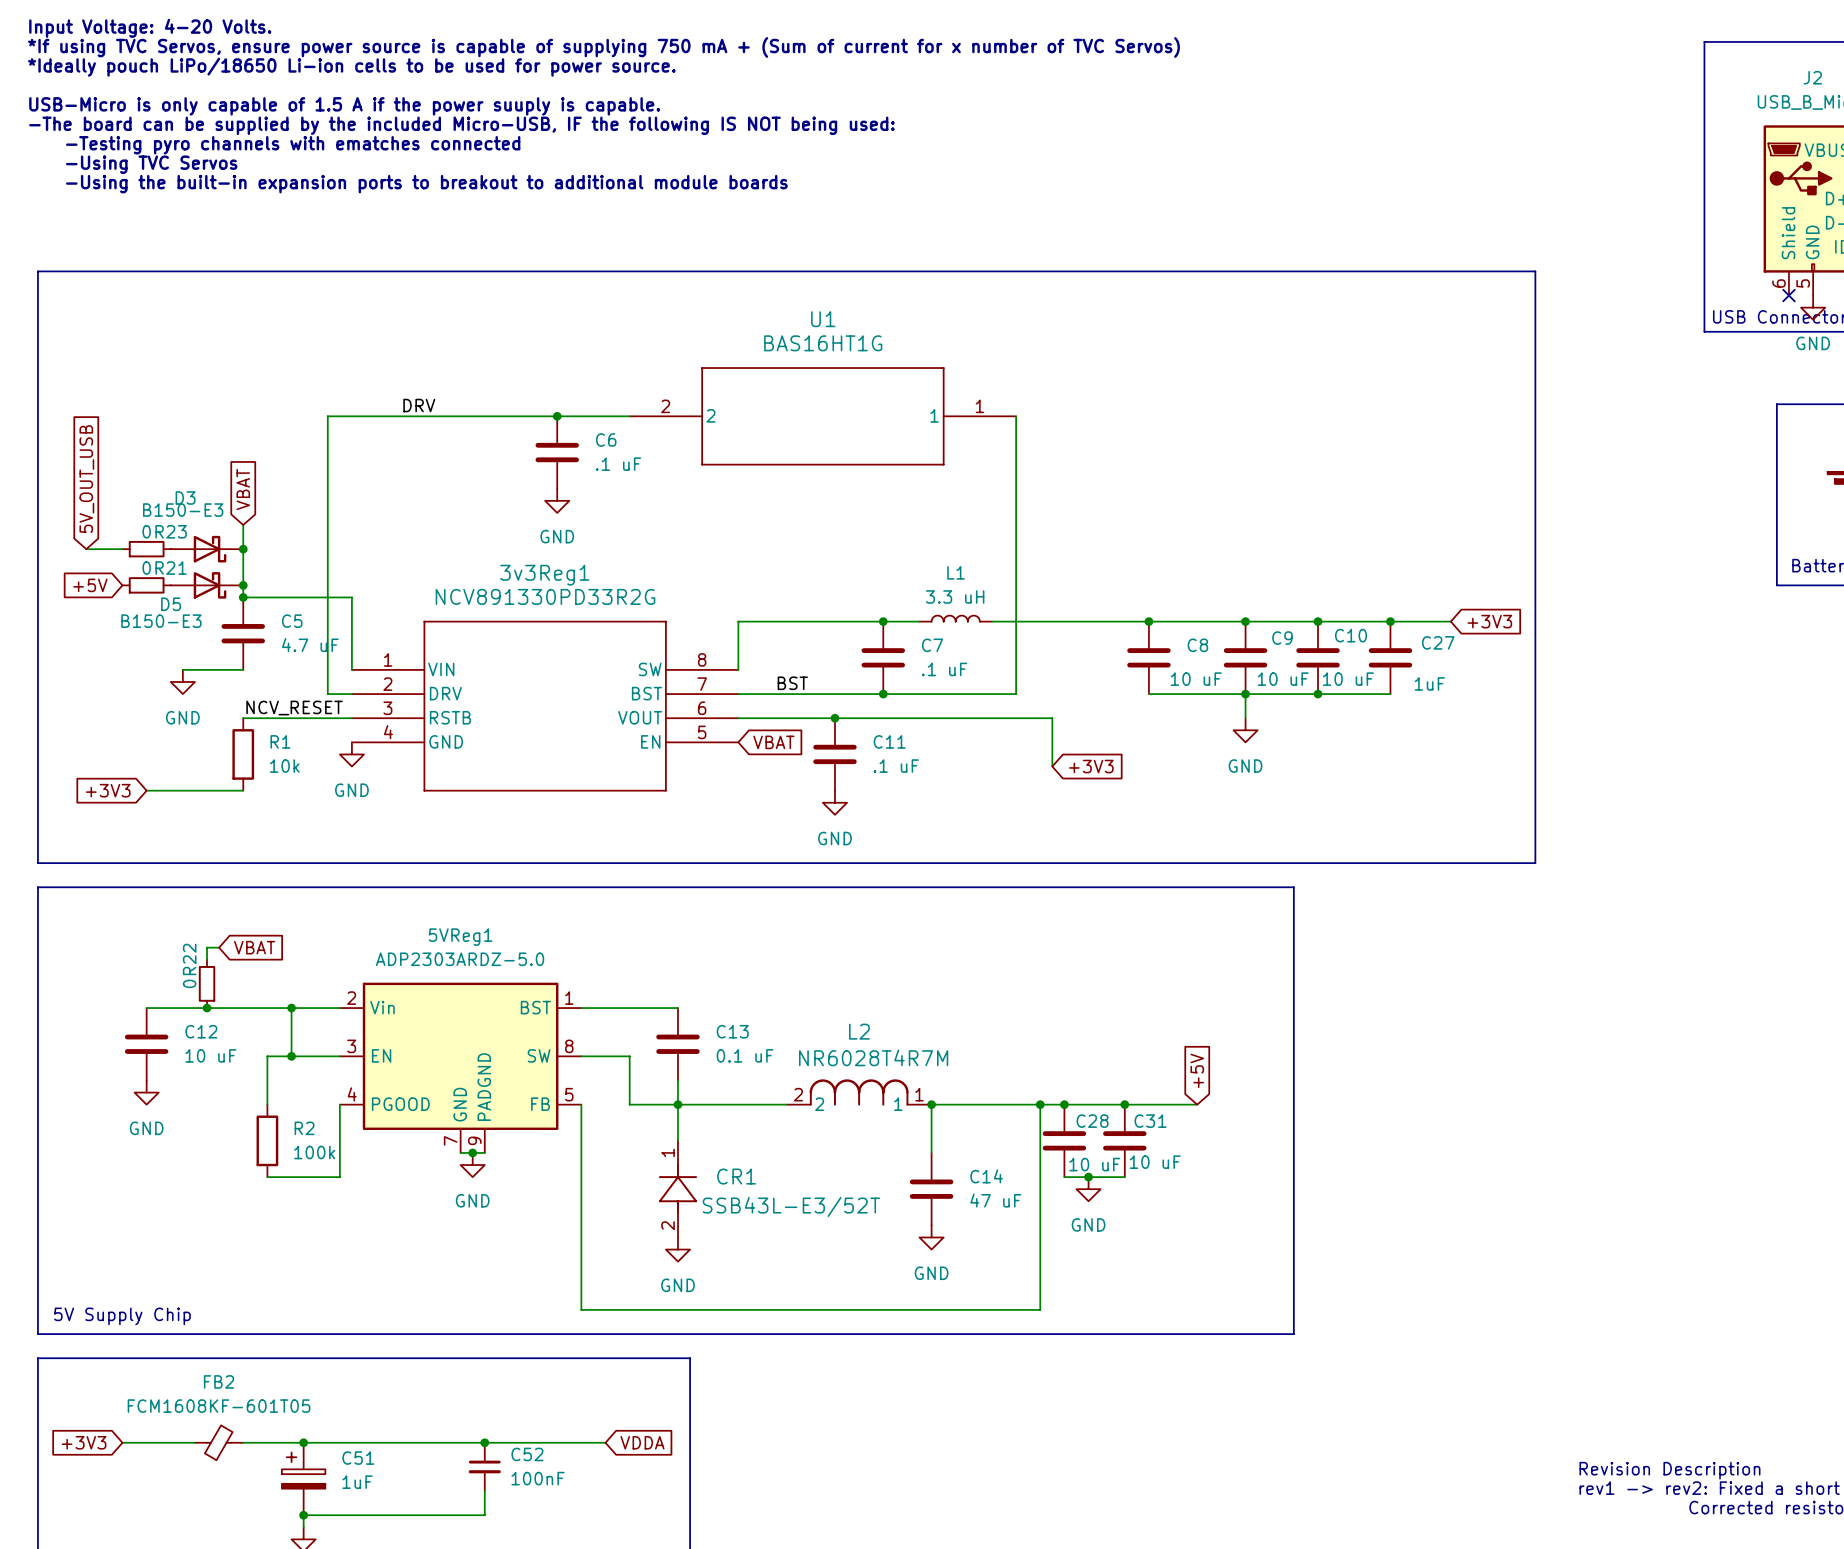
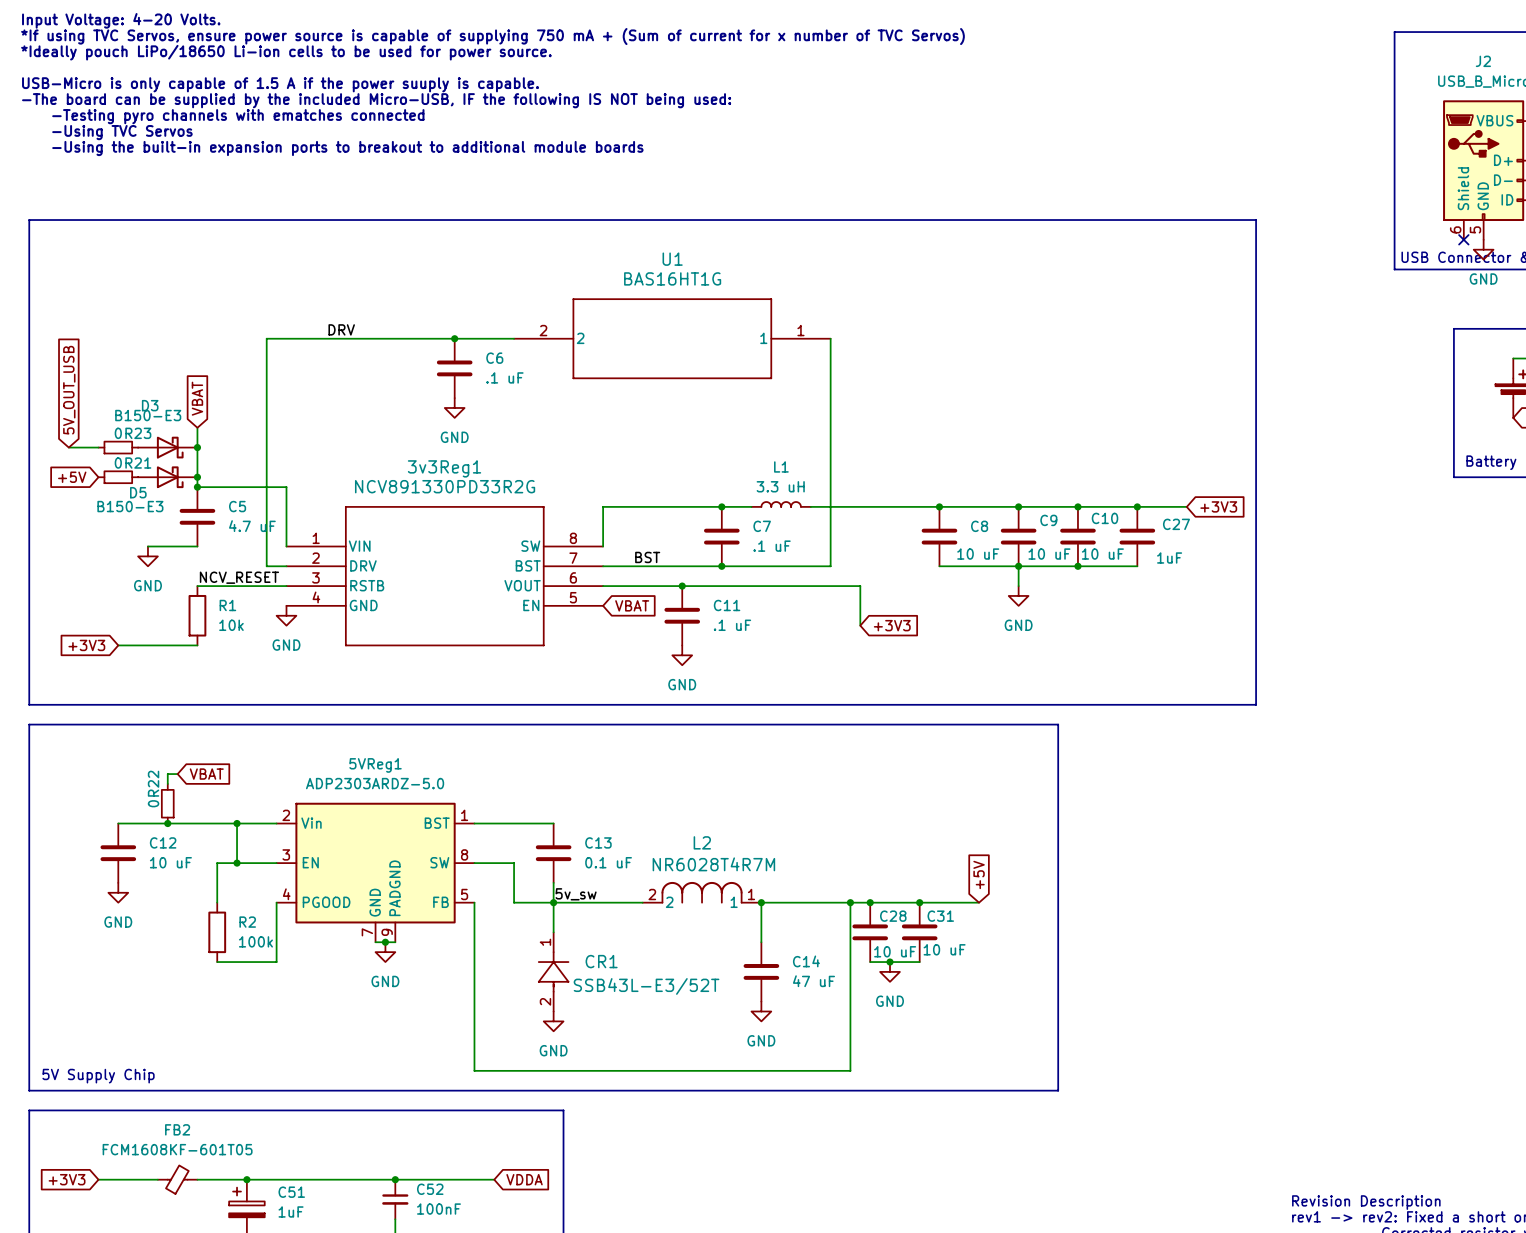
label: none -> 5v_sw (576, 894)

